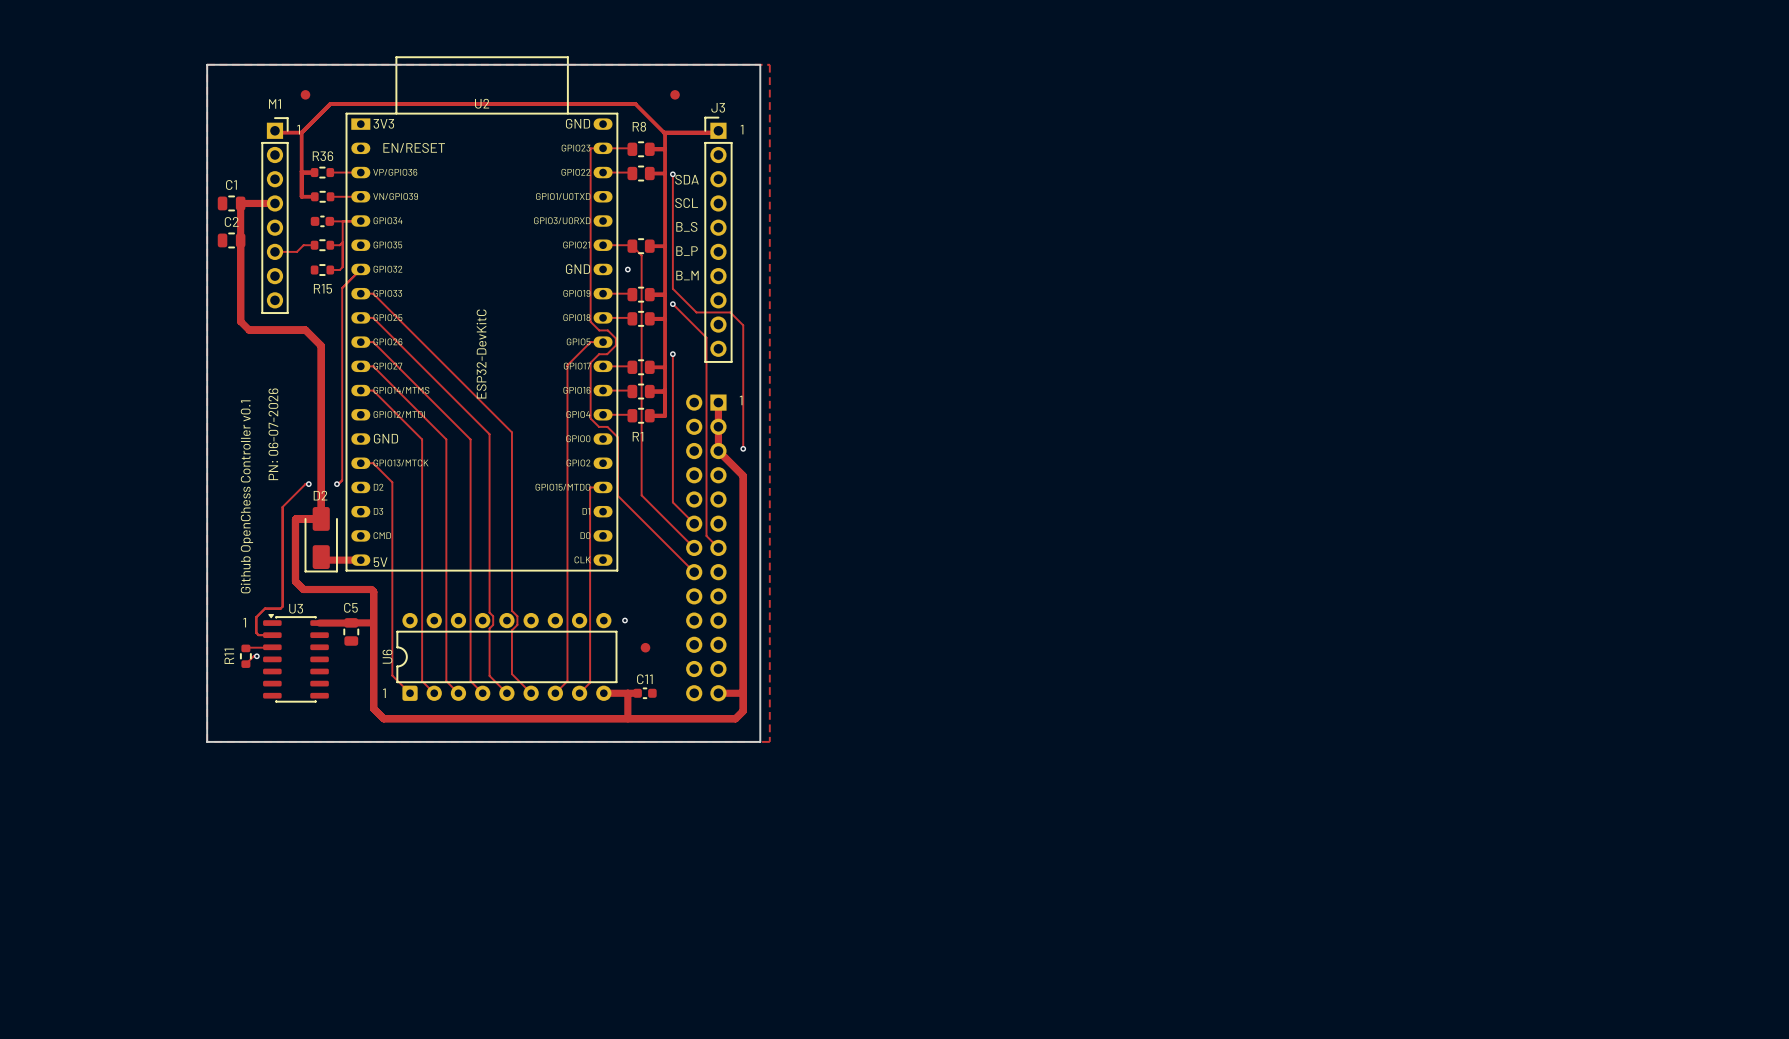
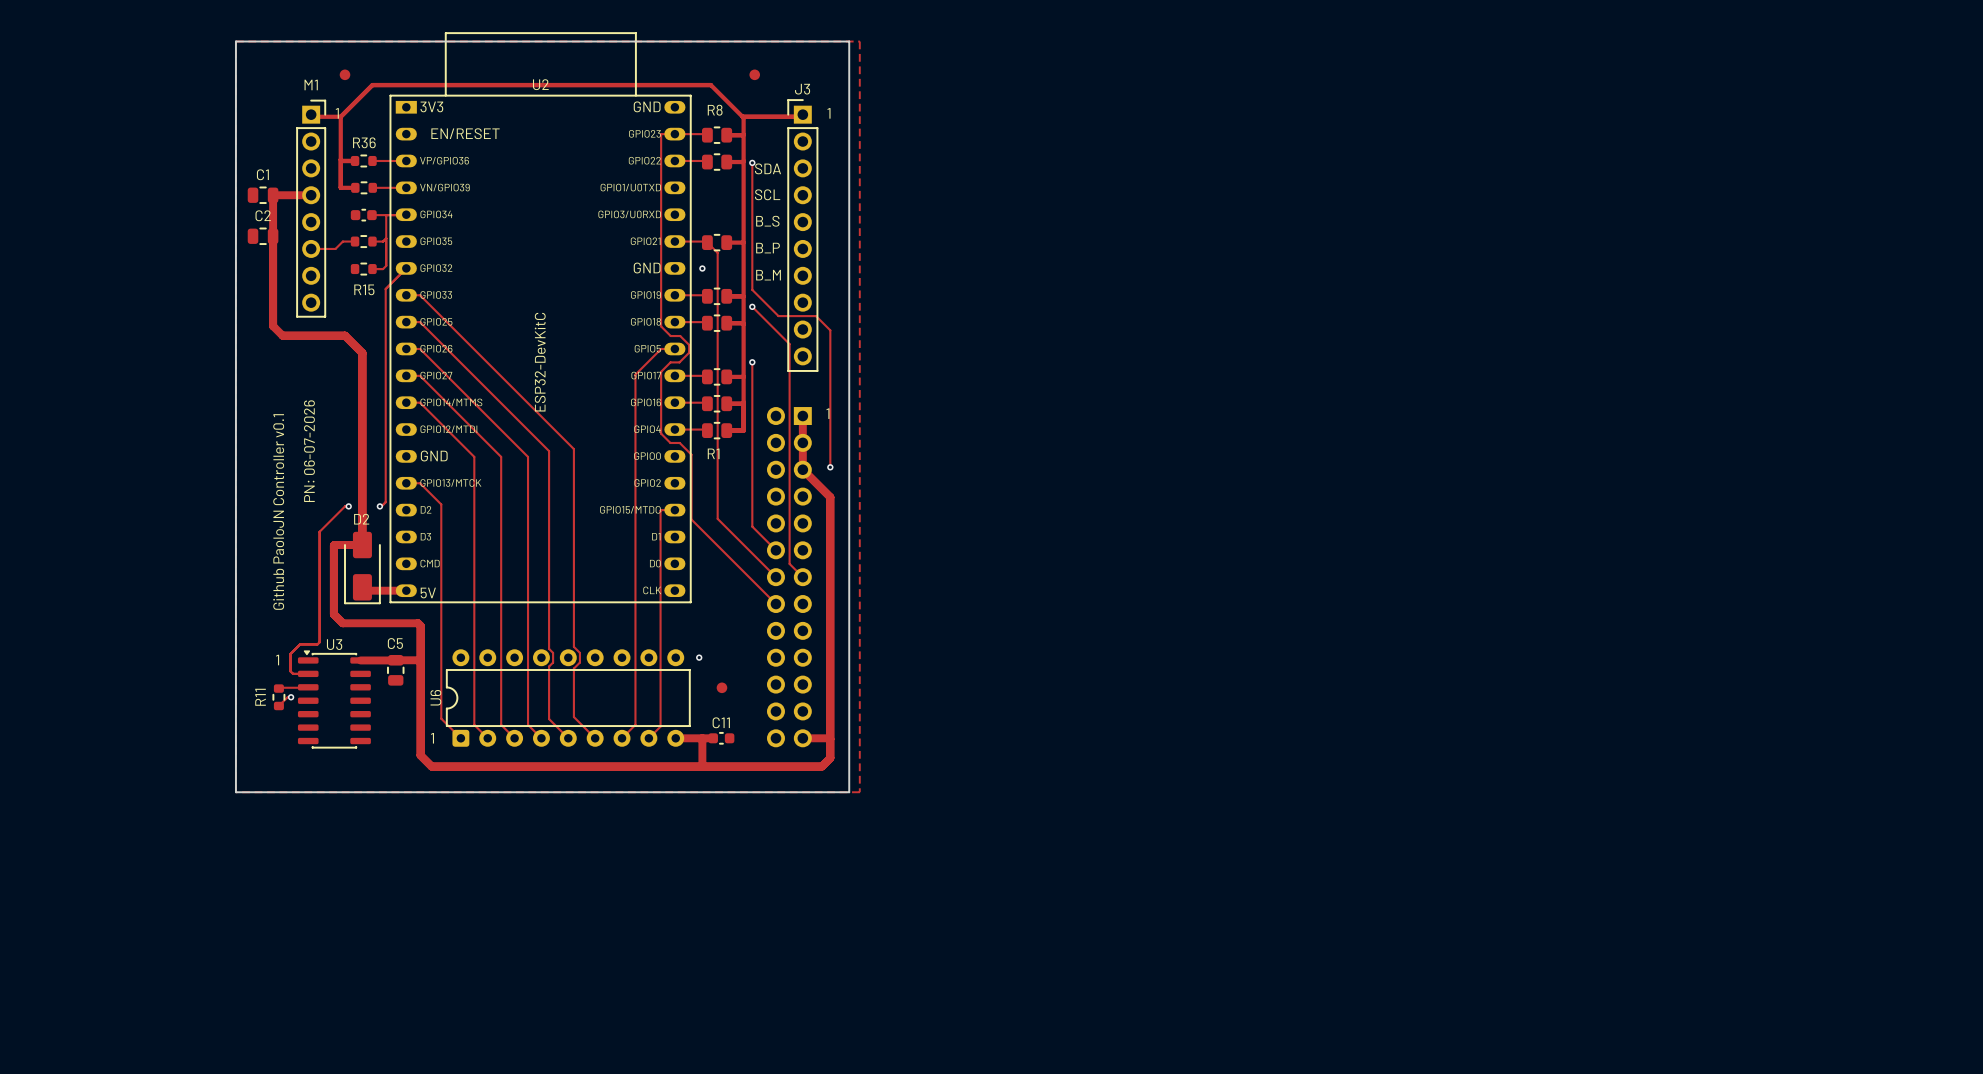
text: Github OpenChess Controller v0.1 (246, 496) -> Github PaoloJN Controller v0.1 (278, 511)

